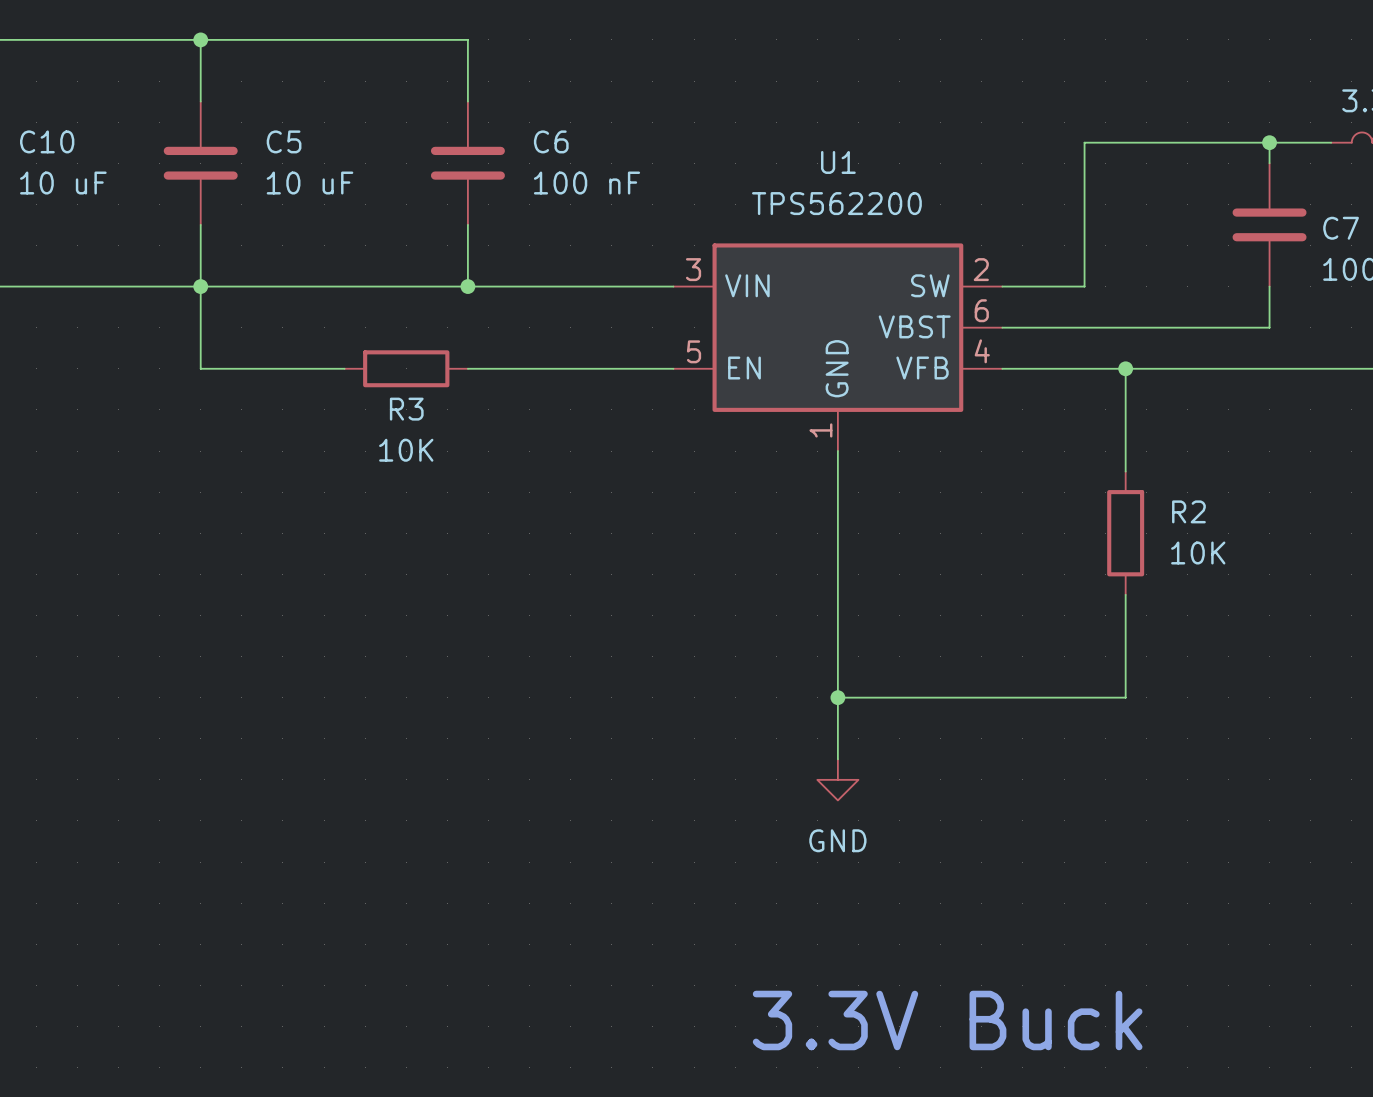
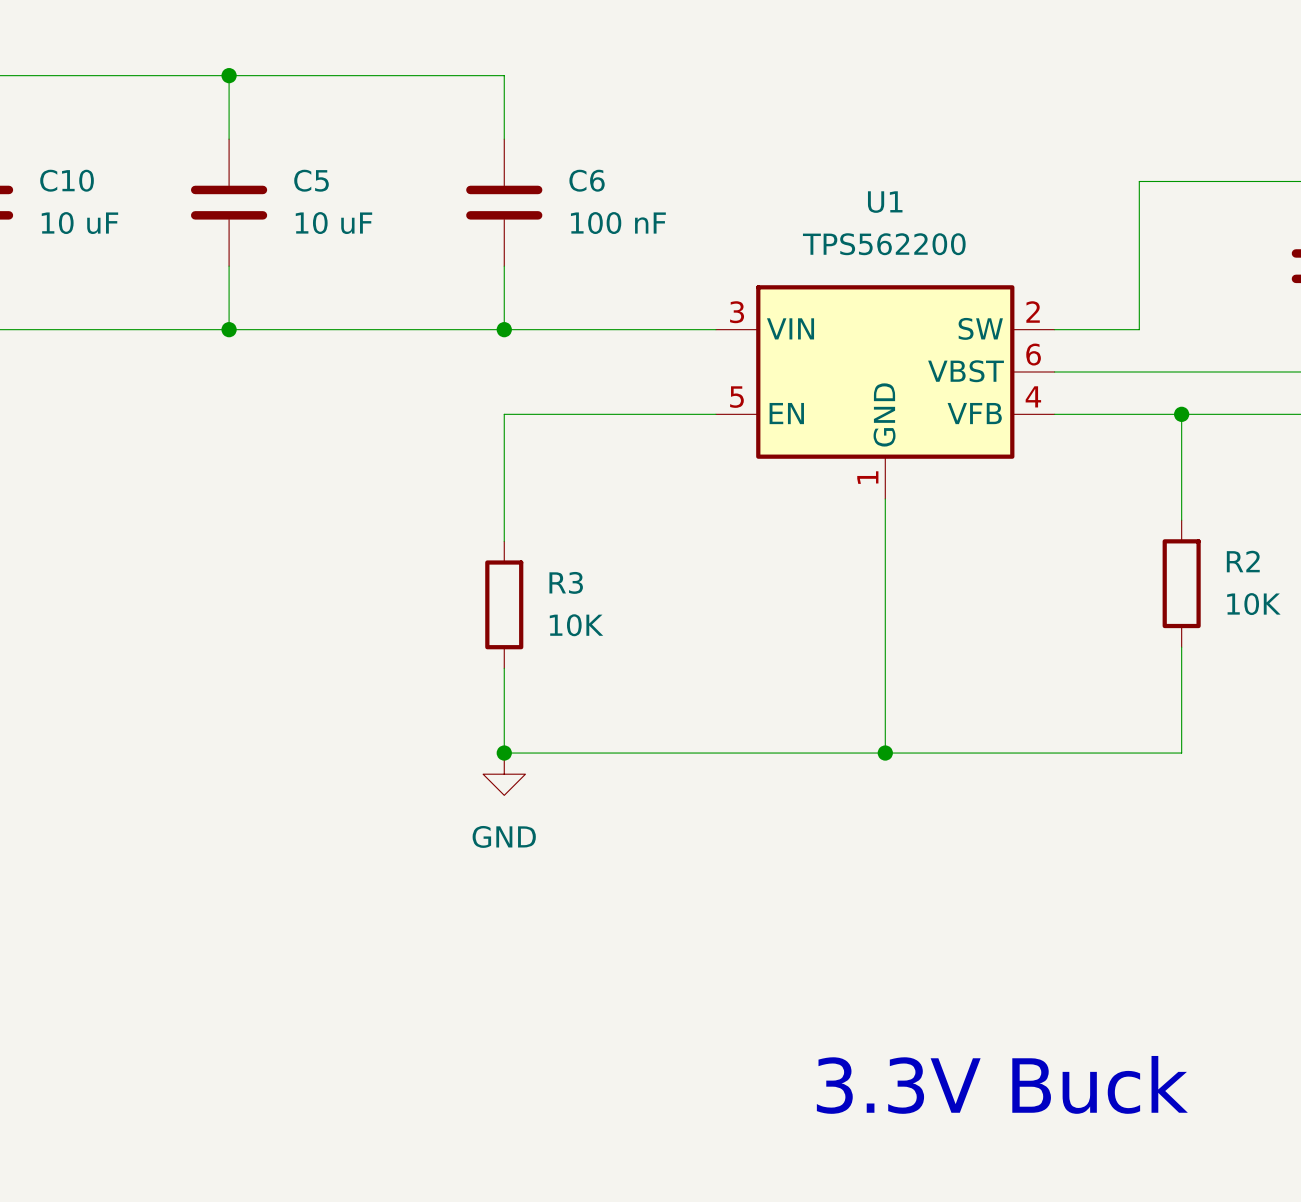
wire: (200, 286) (200, 368) (344, 368) -> none
R3 rotation: 0° (406, 368) -> 90° clockwise (504, 604)
R3 position: (406, 368) -> (504, 604)
wire: none -> (504, 414) (504, 541)
R3 name position: R3 (406, 409) -> R3 (566, 582)
R3 value position: 10K (406, 450) -> 10K (576, 625)
junction: none -> (504, 753)
wire: (837, 697) (837, 759) -> (885, 753) (504, 753) (504, 668)
power symbol position: GND (837, 779) -> GND (504, 774)

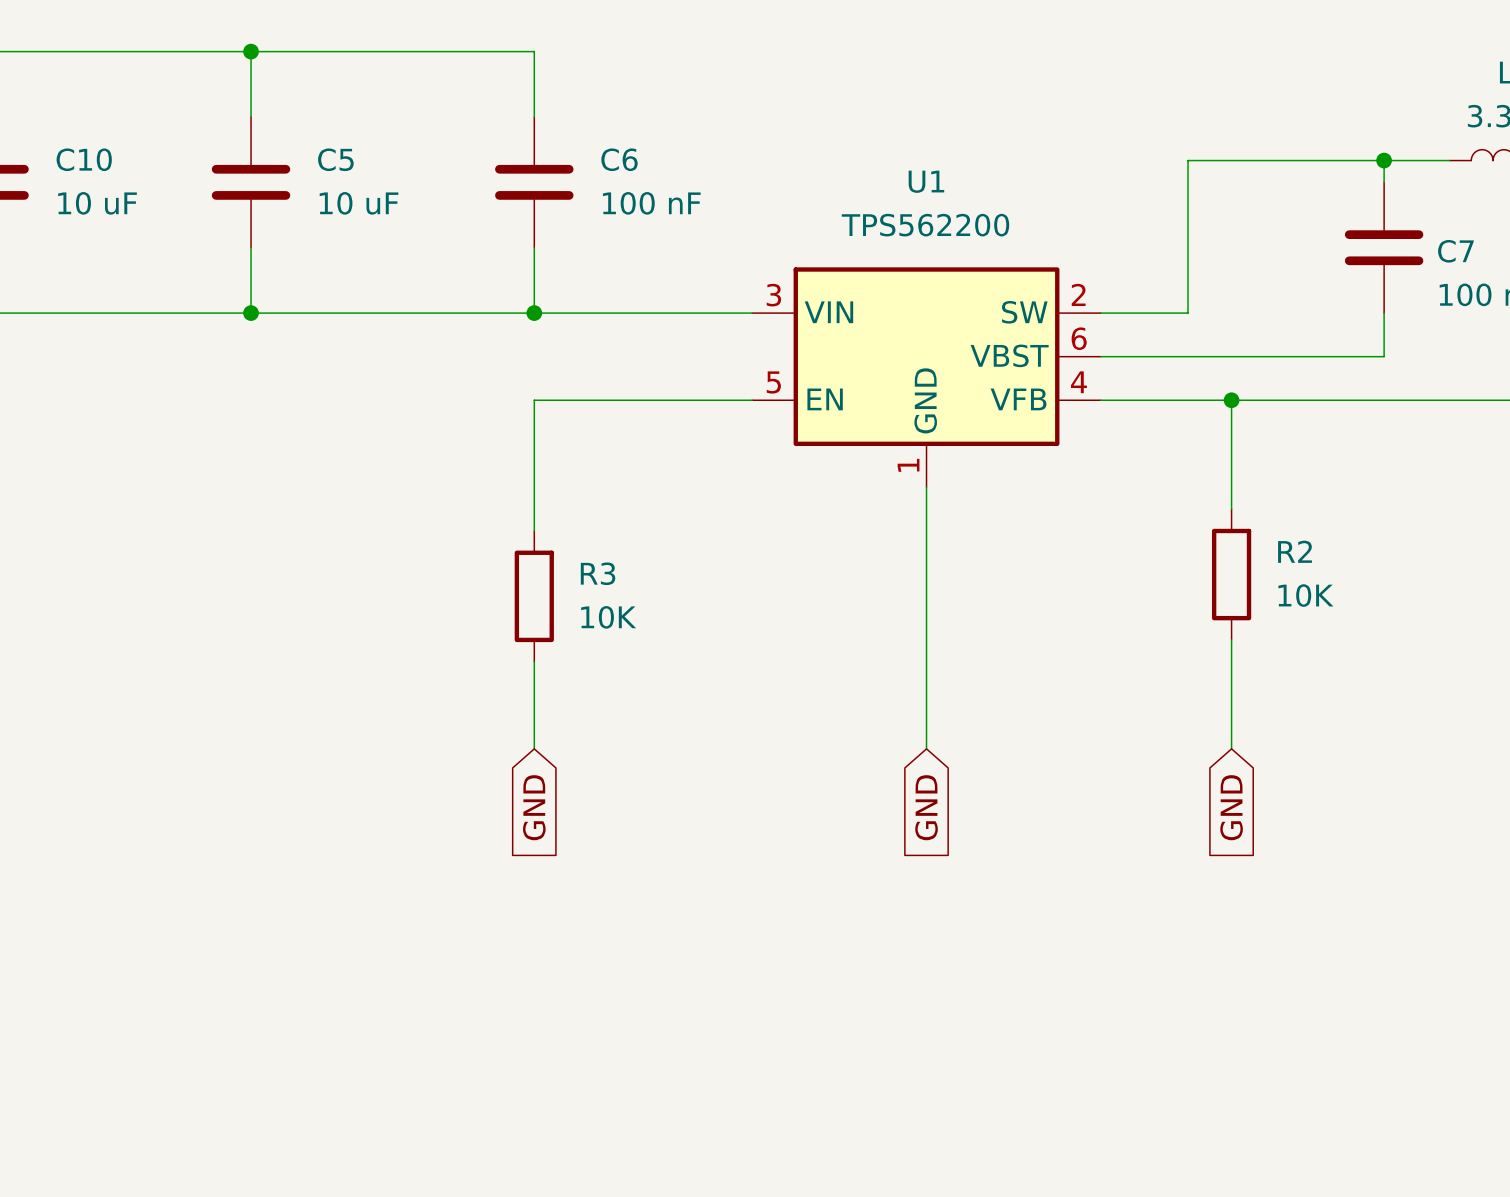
wire: (504, 753) (1181, 753) -> none
junction: (504, 753) -> none
junction: (885, 753) -> none
power symbol: GND (504, 774) -> none
global label: none -> GND (534, 807)
global label: none -> GND (926, 807)
global label: none -> GND (1231, 807)
text: 3.3V Buck (1002, 1084) -> none

